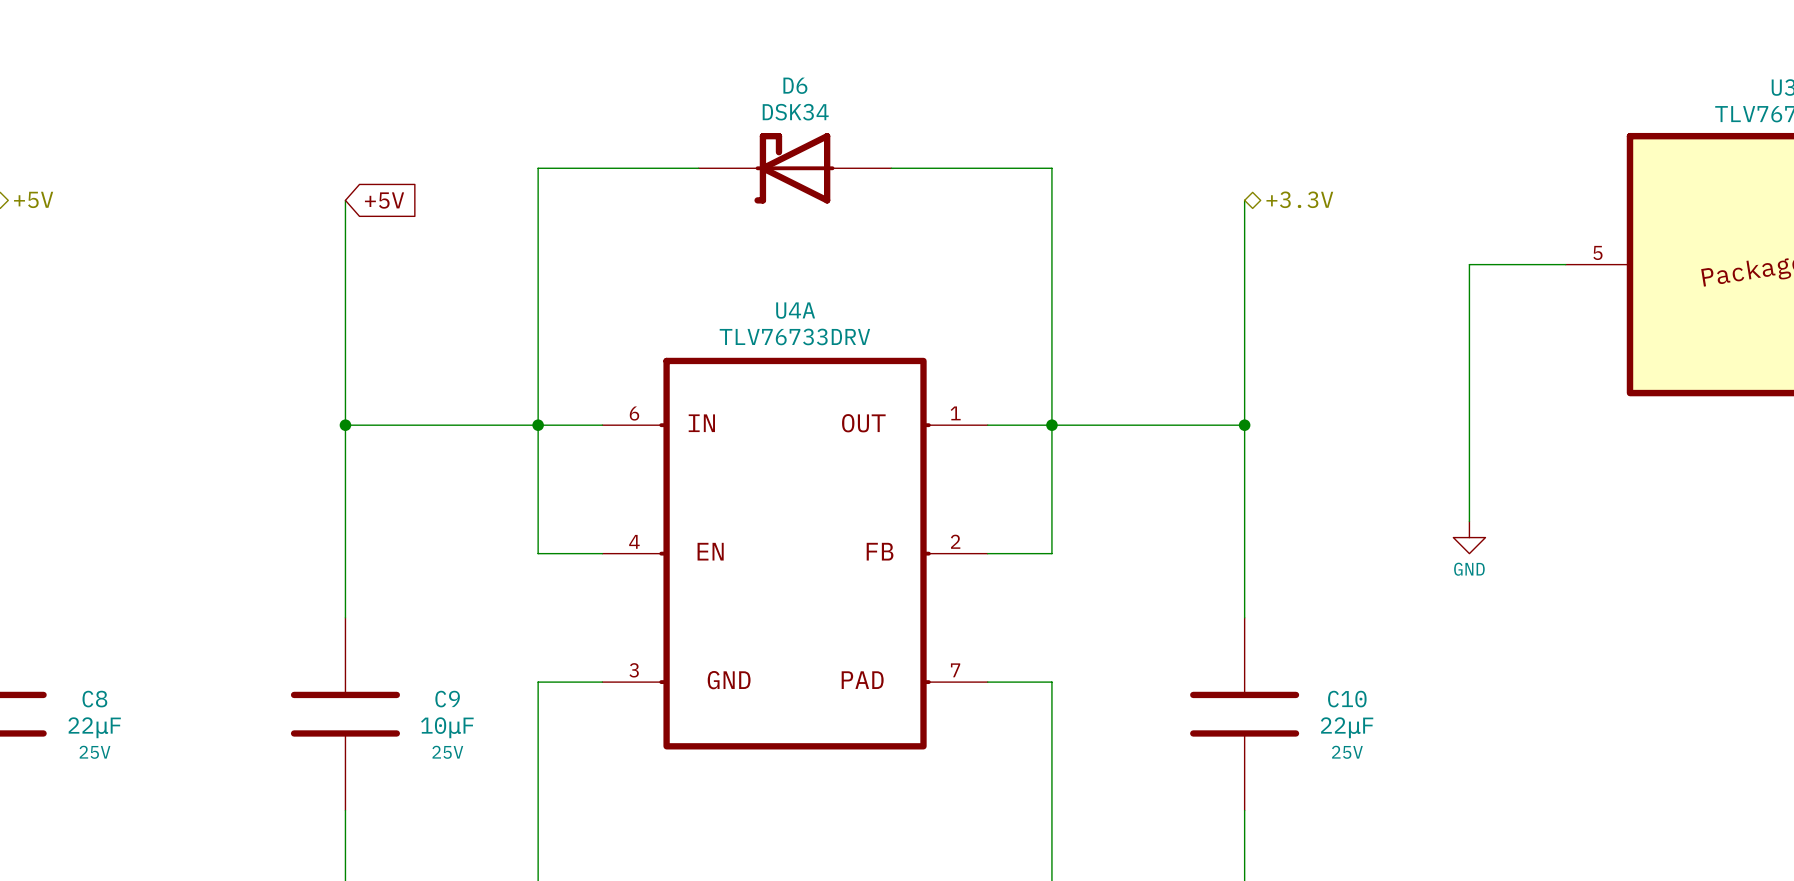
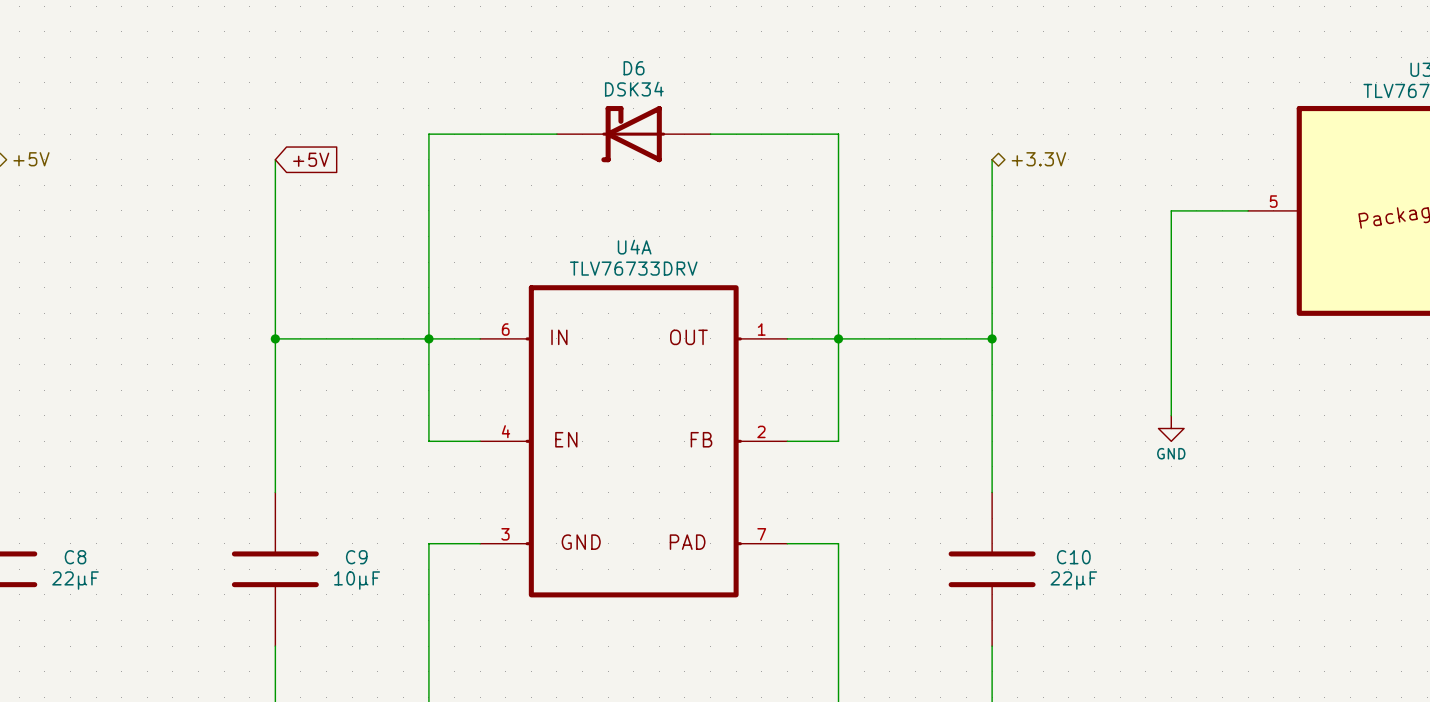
C8 text: 25V (94, 752) -> none
C9 text: 25V (447, 752) -> none
C10 text: 25V (1347, 752) -> none

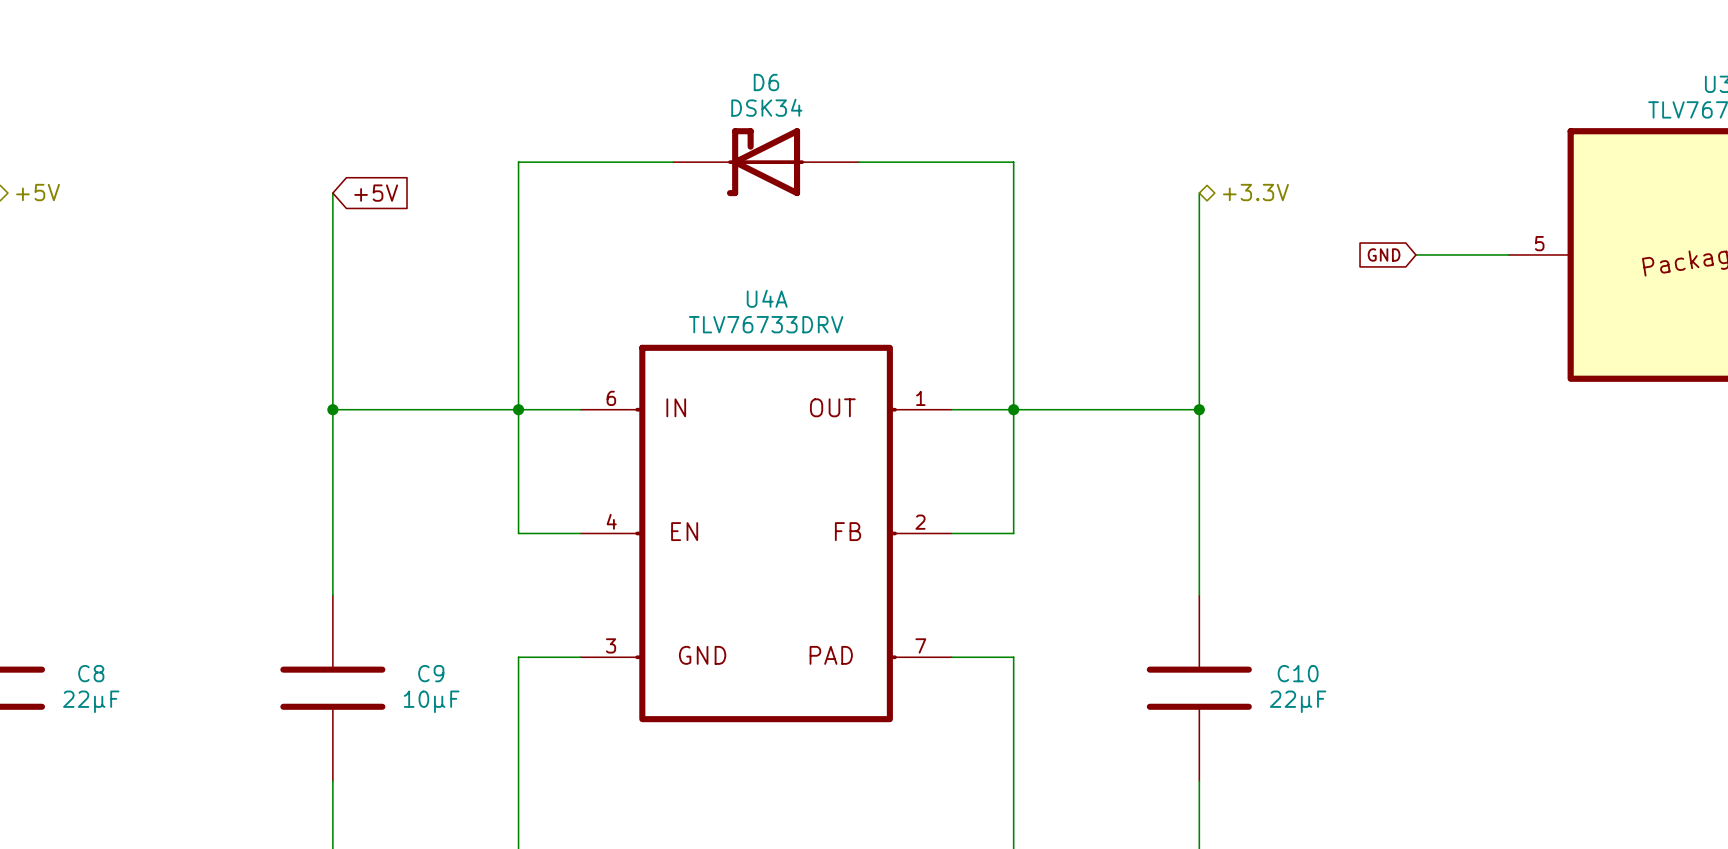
global label: none -> GND (1384, 254)
wire: (1171, 210) (1171, 415) -> none
power symbol: GND (1171, 428) -> none

